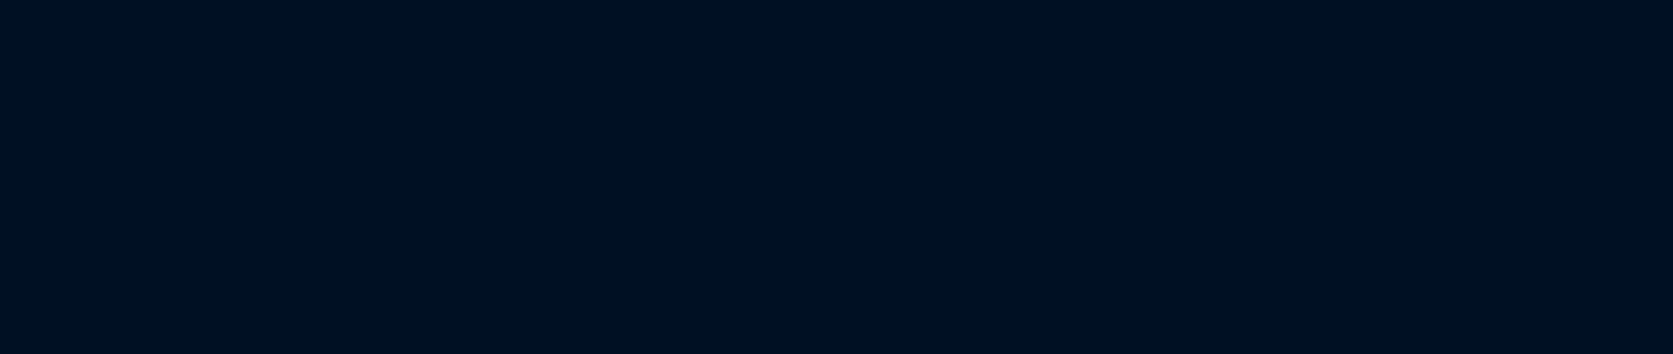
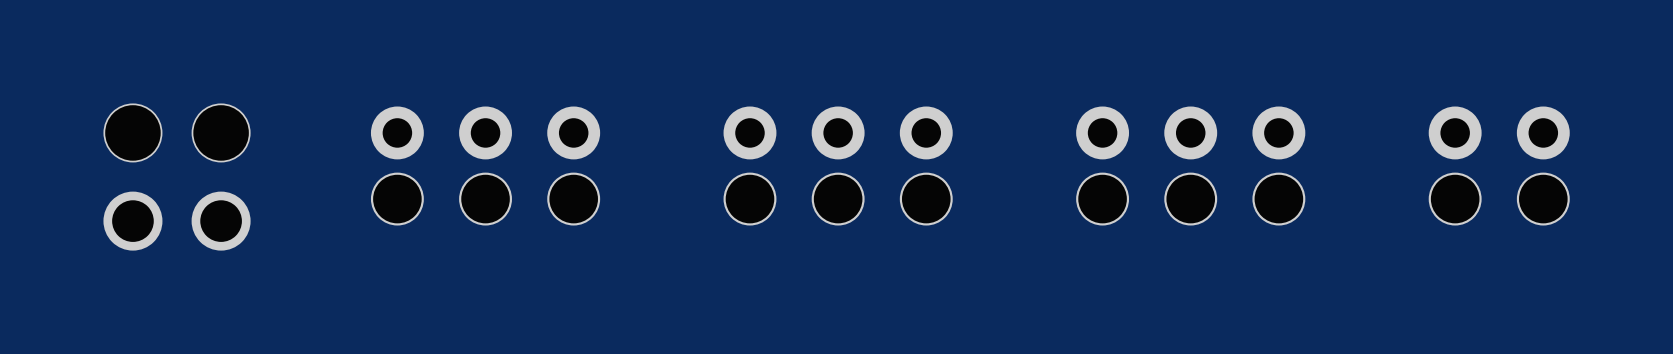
part: none -> (485, 166)
part: none -> (838, 166)
part: none -> (1190, 166)
part: none -> (1499, 166)
part: none -> (177, 177)

